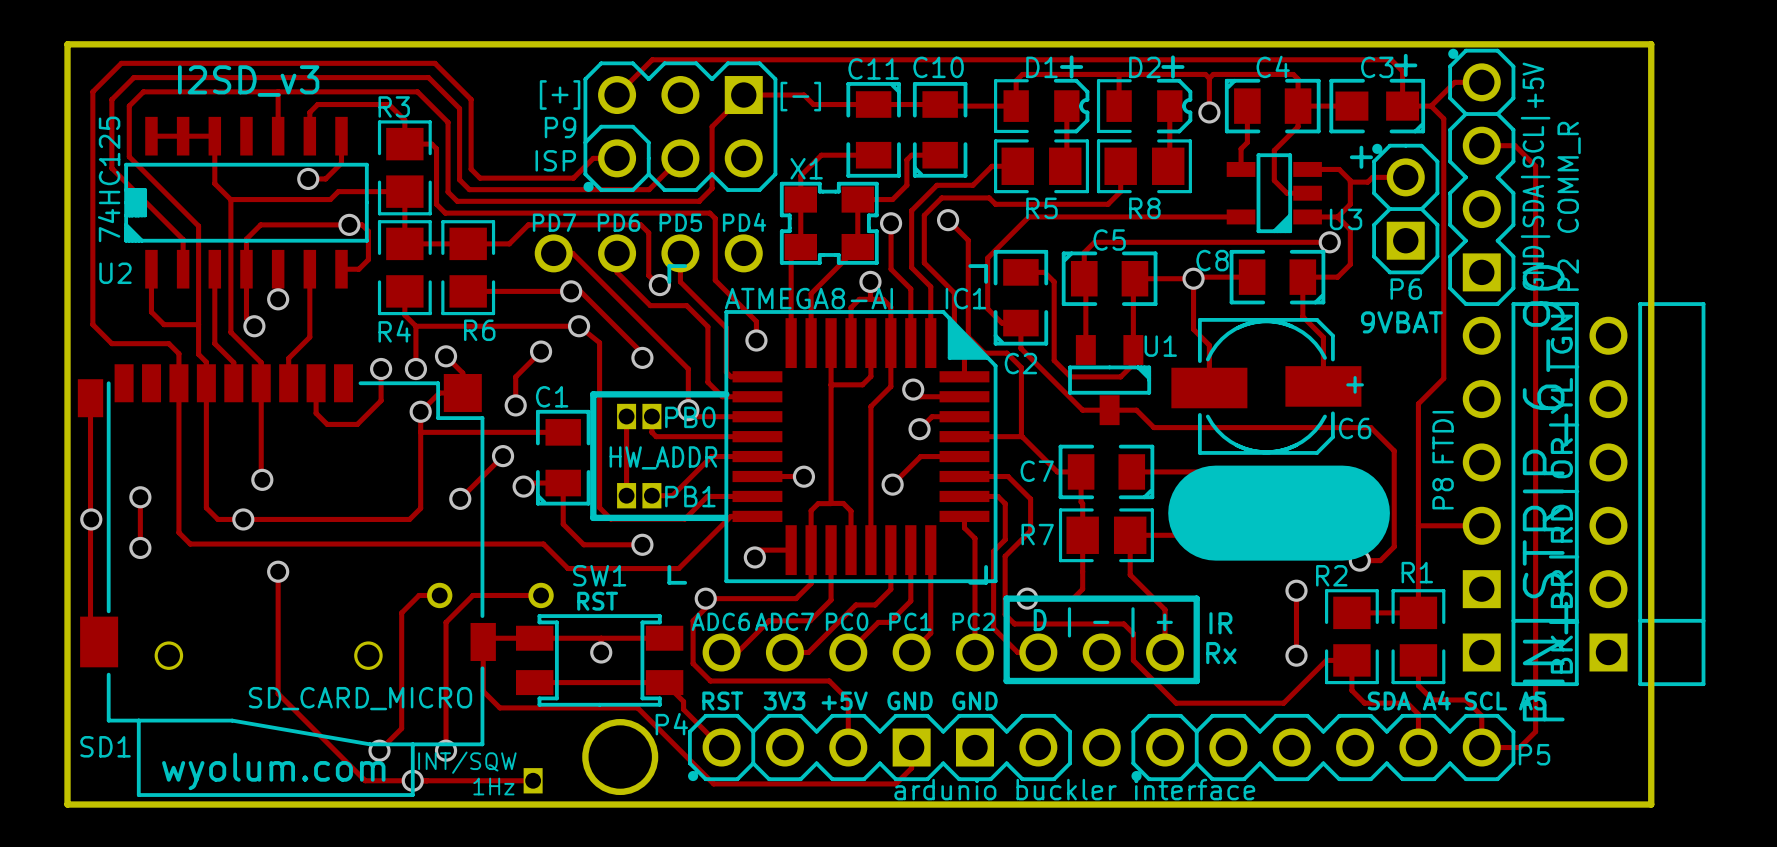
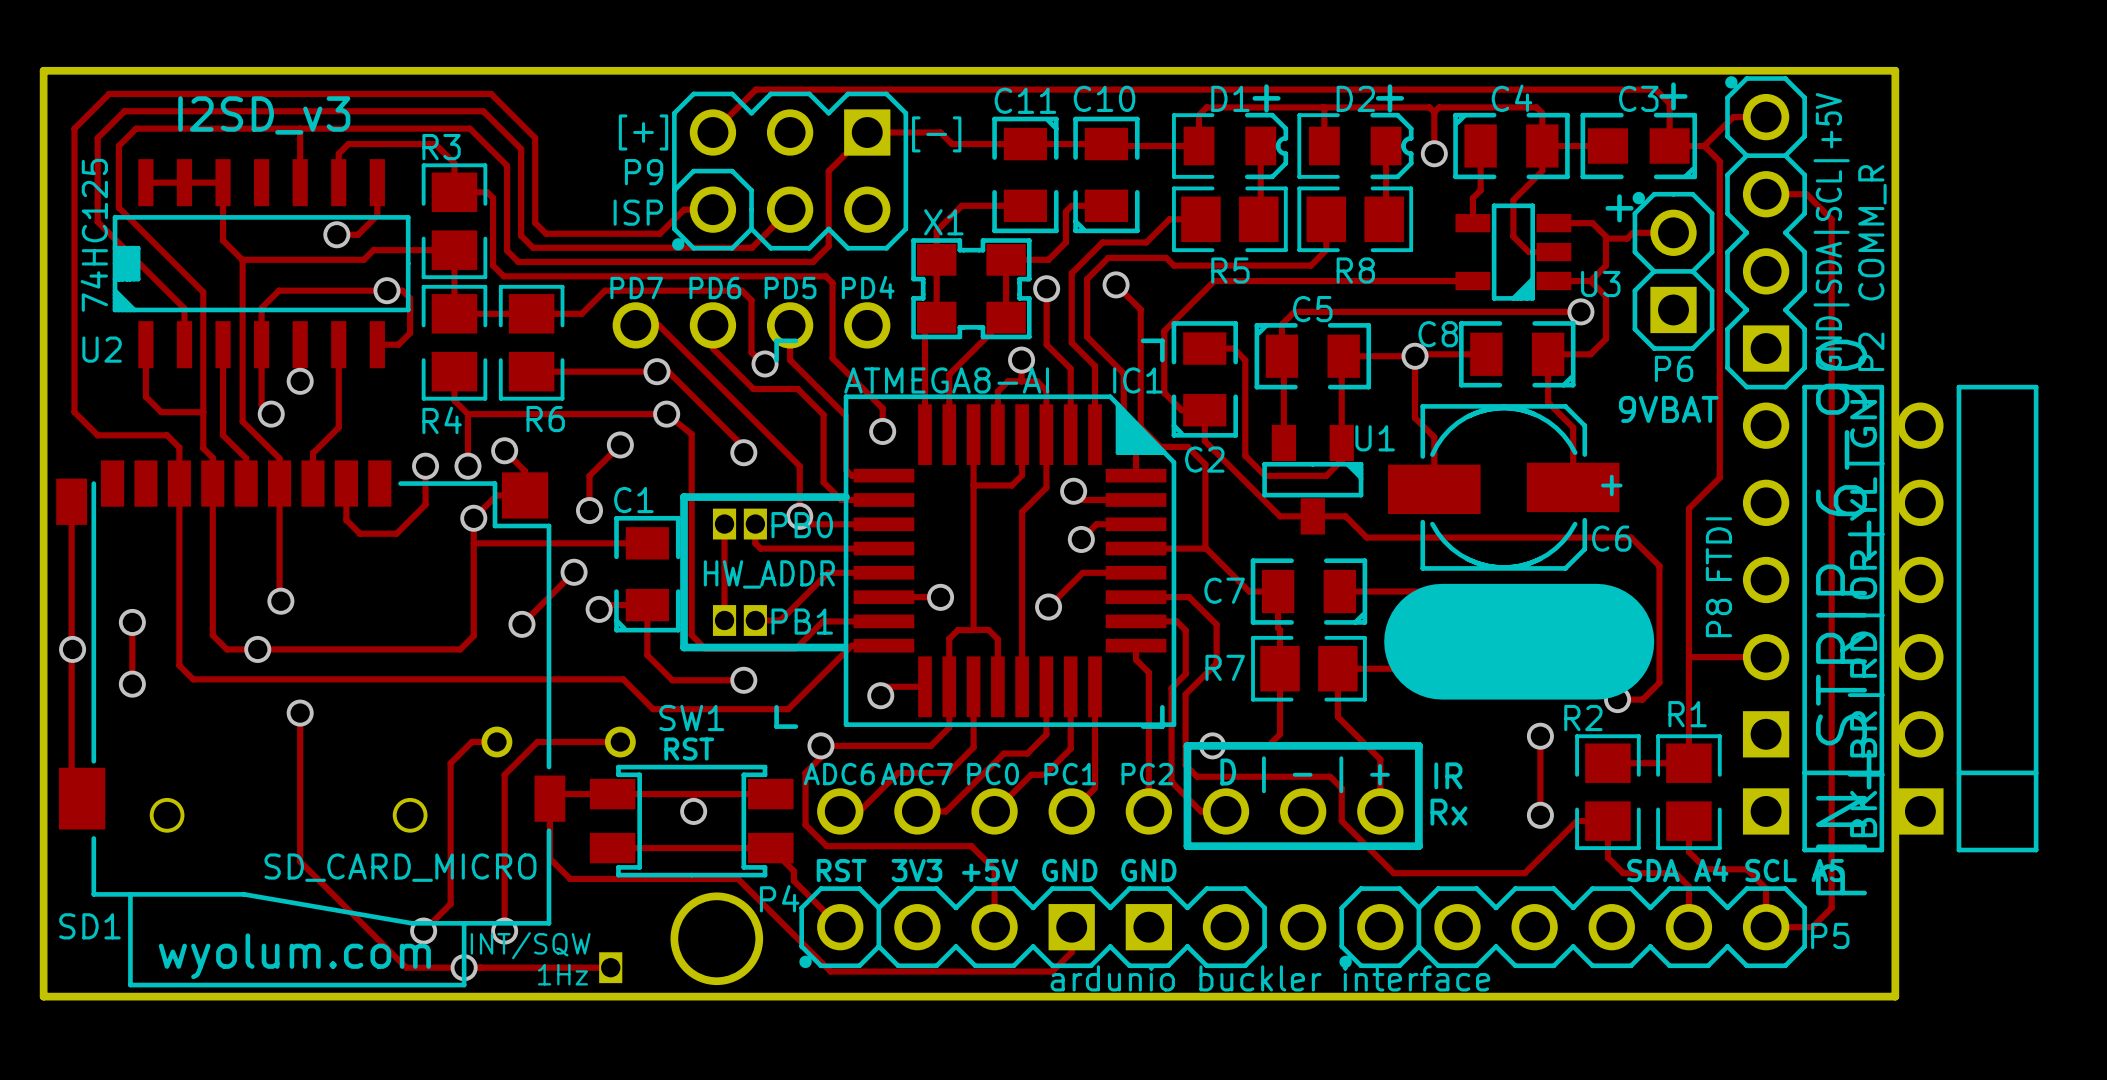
board edge: (1587, 44) (1651, 44) (1651, 804) (1587, 804) -> (1895, 70) (1895, 996)

